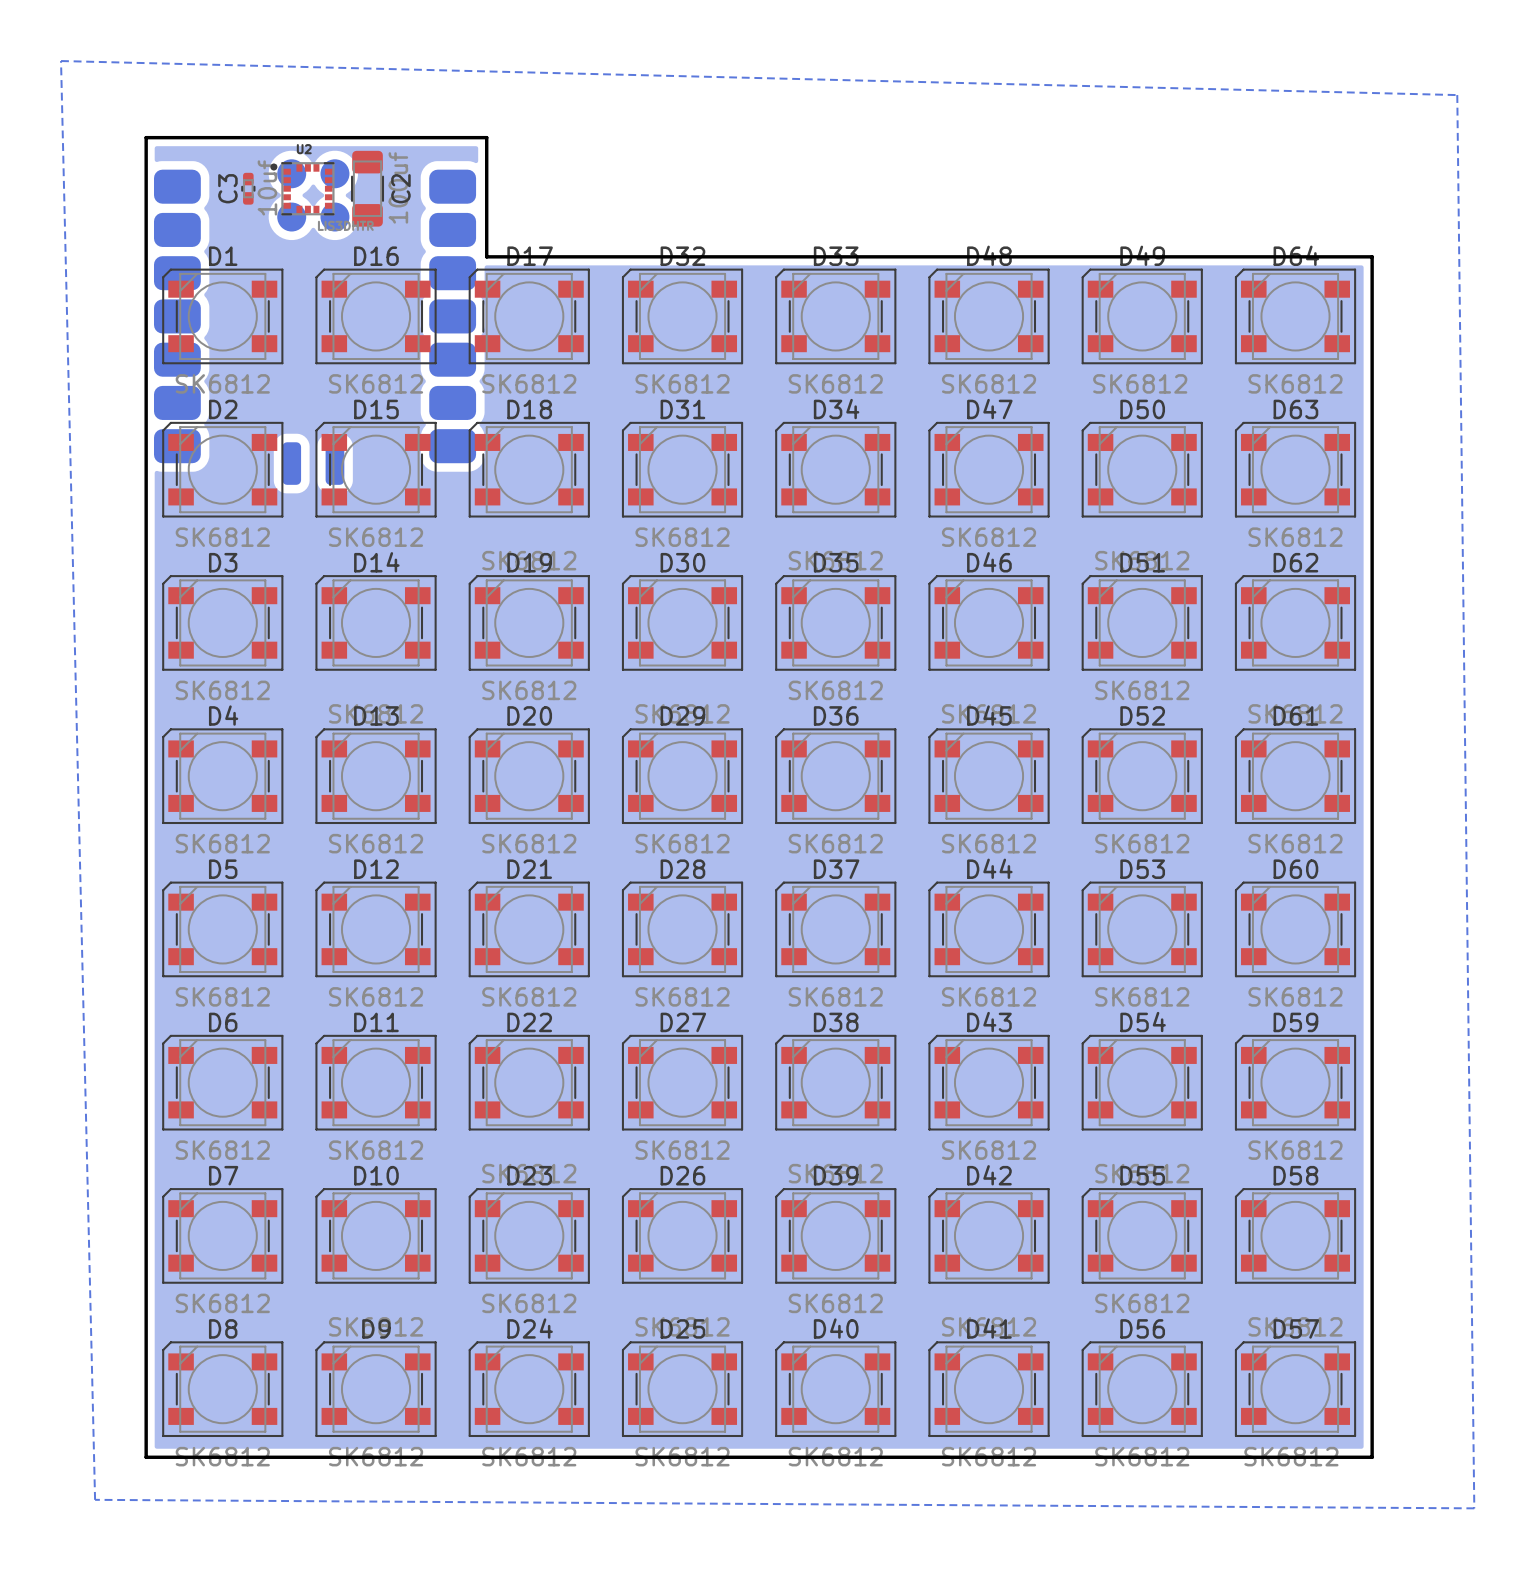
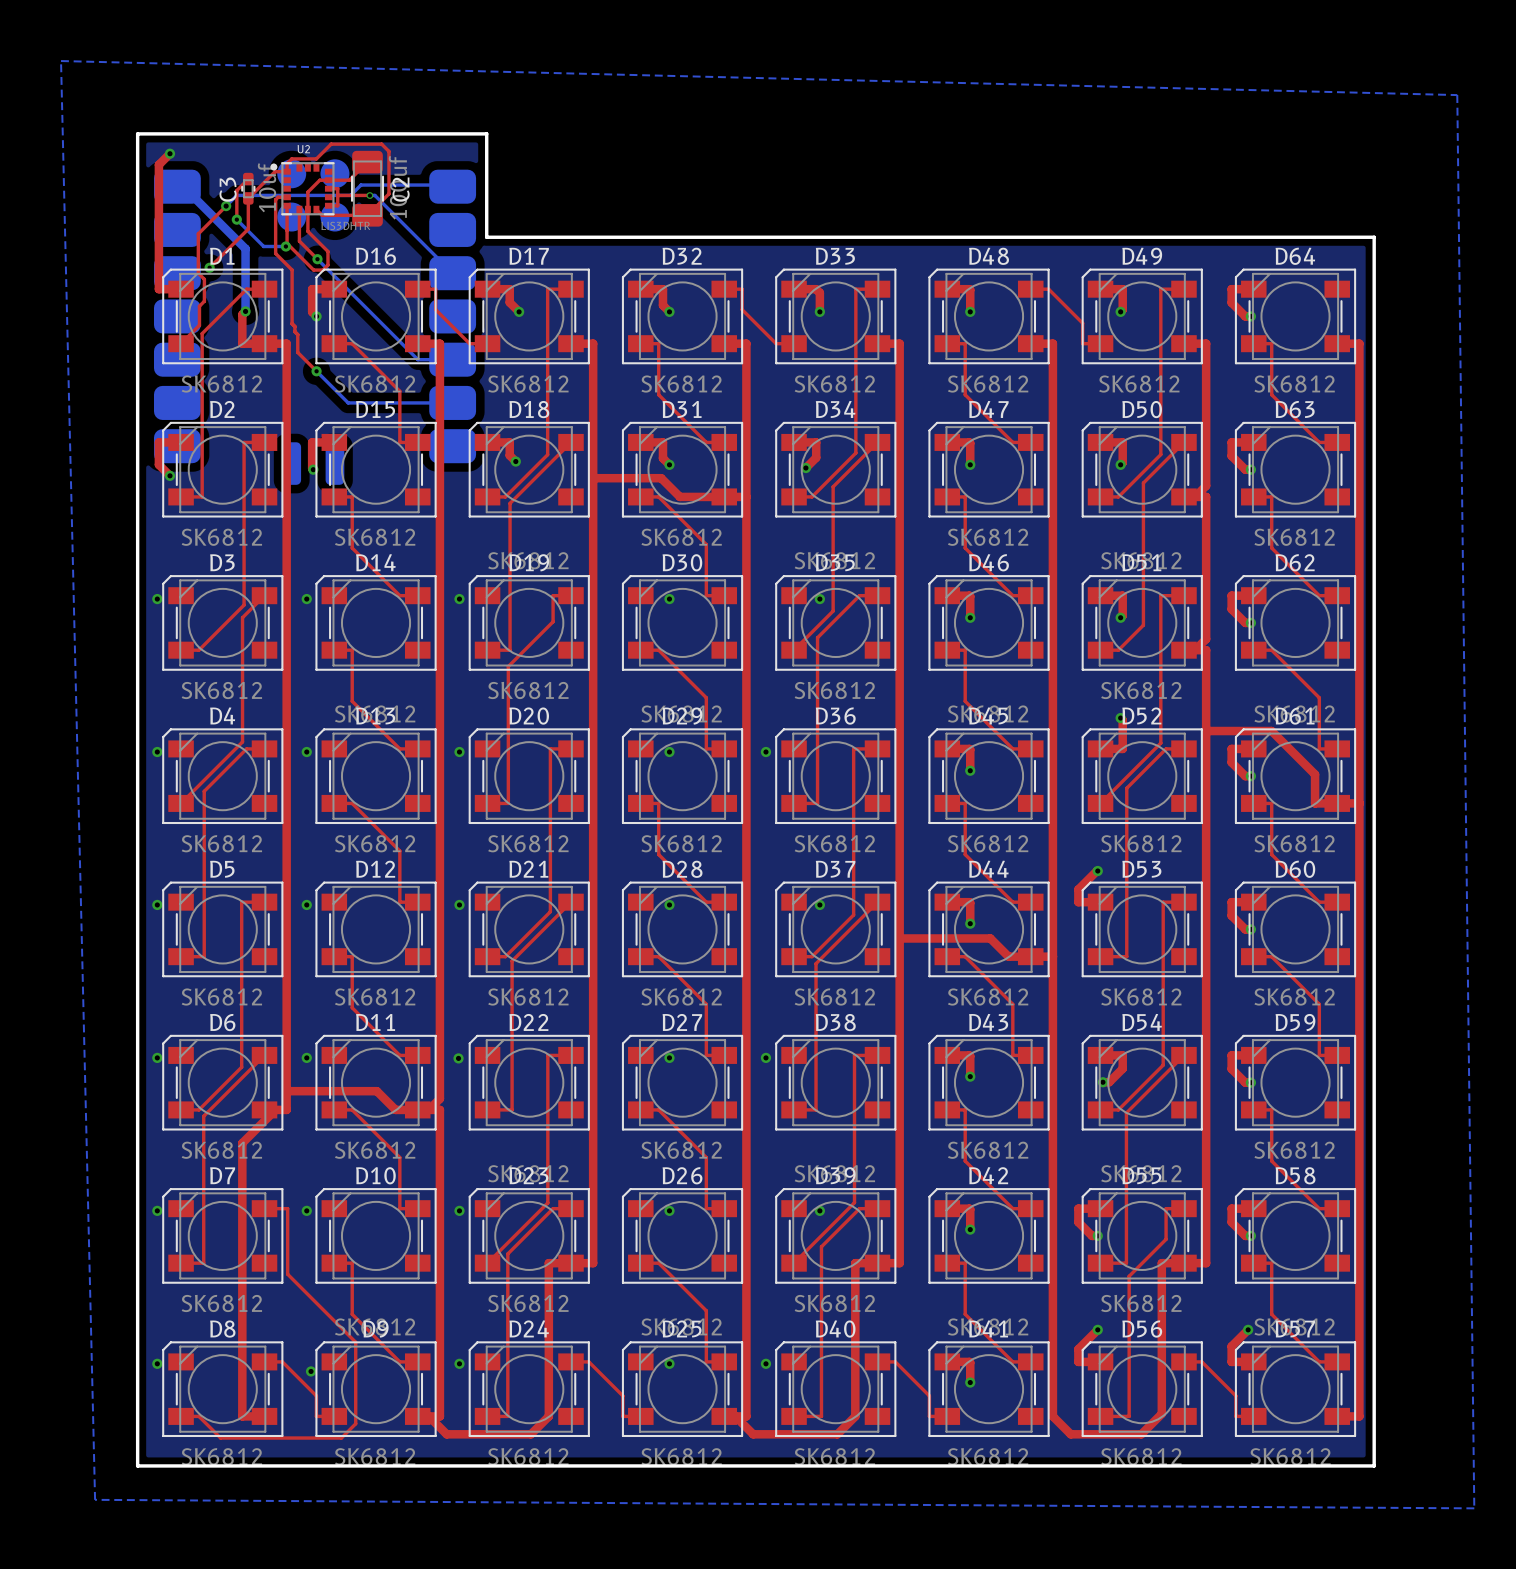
board edge: (486, 137) (146, 137) (146, 1457) (1372, 1457) (1372, 256) (486, 256) (486, 237) -> (486, 137) (486, 133) (137, 133) (137, 1465) (1374, 1465) (1374, 237) (486, 237)
top track: none -> (169, 153) (158, 164) (158, 289) (181, 289)
via: none -> (169, 153)
top track: none -> (367, 162) (349, 180) (319, 180) (307, 192) (307, 231) (327, 251) (327, 265) (323, 270) (313, 270) (287, 244)
top track: none -> (248, 179) (236, 190) (236, 219)
bottom track: none -> (177, 186) (183, 186) (245, 248) (245, 311)
bottom track: none -> (452, 186) (451, 185) (361, 185) (350, 195) (236, 195) (226, 206)
top track: none -> (328, 188) (337, 188) (337, 205) (328, 205)
top track: none -> (337, 195) (369, 195)
bottom track: none -> (369, 195) (374, 195) (452, 273)
via: none -> (369, 195)
top track: none -> (287, 197) (278, 197) (275, 199) (275, 253) (292, 270) (292, 323) (297, 334) (297, 352) (316, 371)
top track: none -> (287, 205) (287, 244)
top track: none -> (226, 206) (198, 233) (198, 273) (204, 279) (204, 301) (199, 306) (199, 325) (181, 343)
via: none -> (226, 206)
top track: none -> (299, 209) (299, 241) (317, 259)
top track: none -> (316, 209) (322, 215) (367, 215) (388, 193) (388, 151) (381, 144) (331, 144) (316, 158) (291, 158) (287, 163) (287, 171) (275, 171) (248, 198) (248, 229) (209, 267)
bottom track: none -> (236, 219) (263, 246) (285, 246)
via: none -> (236, 219)
via: none -> (285, 246)
bottom track: none -> (317, 259) (417, 359) (452, 359)
via: none -> (317, 259)
via: none -> (209, 267)
top track: none -> (264, 289) (246, 289) (202, 333) (202, 496) (181, 496)
top track: none -> (334, 289) (312, 289) (312, 312) (316, 316)
top track: none -> (417, 289) (435, 289) (435, 309) (469, 343) (487, 343)
top track: none -> (487, 289) (509, 289) (509, 302) (519, 311)
top track: none -> (571, 289) (547, 289) (547, 454) (505, 496) (487, 496)
top track: none -> (640, 289) (662, 289) (662, 305) (669, 311)
top track: none -> (724, 289) (742, 289) (742, 309) (776, 343) (794, 343)
top track: none -> (794, 289) (816, 289) (819, 292) (819, 311)
top track: none -> (877, 289) (855, 289) (855, 453) (811, 496) (794, 496)
top track: none -> (947, 289) (969, 289) (970, 311)
top track: none -> (1030, 289) (1048, 289) (1082, 323) (1082, 343) (1100, 343)
top track: none -> (1100, 289) (1122, 289) (1122, 309) (1120, 311)
top track: none -> (1183, 289) (1160, 289) (1160, 454) (1118, 496) (1100, 496)
top track: none -> (1253, 289) (1231, 289) (1231, 302) (1245, 316) (1250, 316)
top track: none -> (245, 311) (242, 314) (242, 343) (286, 343) (286, 1109) (264, 1109)
via: none -> (245, 311)
via: none -> (519, 311)
via: none -> (669, 311)
via: none -> (819, 311)
via: none -> (970, 311)
via: none -> (1120, 311)
via: none -> (316, 316)
via: none -> (1250, 316)
top track: none -> (334, 343) (352, 343) (399, 391) (399, 442) (417, 442)
top track: none -> (417, 343) (439, 343) (439, 1098) (428, 1109)
top track: none -> (571, 343) (593, 343) (593, 1263) (548, 1263) (548, 1416) (530, 1434) (446, 1434) (428, 1416)
top track: none -> (640, 343) (658, 343) (658, 394) (706, 442) (724, 442)
top track: none -> (724, 343) (746, 343) (746, 1416) (724, 1416)
top track: none -> (877, 343) (899, 343) (899, 1263) (855, 1263) (855, 1416) (837, 1434) (753, 1434) (735, 1416)
top track: none -> (947, 343) (965, 343) (965, 394) (1012, 442) (1030, 442)
top track: none -> (1030, 343) (1052, 343) (1052, 1416) (1070, 1434) (1141, 1434) (1161, 1413) (1161, 1263) (1206, 1263) (1206, 650) (1183, 650)
top track: none -> (1183, 343) (1206, 343) (1206, 485) (1195, 496)
top track: none -> (1253, 343) (1271, 343) (1271, 394) (1319, 442) (1337, 442)
top track: none -> (1337, 343) (1359, 343) (1359, 1416) (1337, 1416)
bottom track: none -> (316, 371) (348, 402) (452, 402)
via: none -> (316, 371)
top track: none -> (181, 442) (158, 442) (158, 464) (169, 475)
top track: none -> (264, 442) (244, 442) (244, 605) (198, 650) (181, 650)
top track: none -> (334, 442) (312, 442) (313, 469)
top track: none -> (487, 442) (509, 442) (509, 455) (515, 461)
top track: none -> (571, 442) (510, 503) (510, 650) (487, 650)
top track: none -> (640, 442) (662, 442) (662, 458) (669, 464)
top track: none -> (794, 442) (816, 442) (816, 457) (805, 468)
top track: none -> (877, 442) (833, 486) (833, 611) (794, 650)
top track: none -> (947, 442) (969, 442) (970, 464)
top track: none -> (1100, 442) (1122, 442) (1122, 462) (1120, 464)
top track: none -> (1183, 442) (1143, 483) (1143, 625) (1118, 650) (1100, 650)
top track: none -> (1253, 442) (1231, 442) (1231, 455) (1245, 469) (1250, 469)
via: none -> (515, 461)
via: none -> (669, 464)
via: none -> (970, 464)
via: none -> (1120, 464)
via: none -> (805, 468)
via: none -> (313, 469)
via: none -> (1250, 469)
via: none -> (169, 475)
top track: none -> (593, 478) (661, 478) (679, 496) (746, 496)
top track: none -> (334, 496) (352, 496) (352, 548) (399, 595) (417, 595)
top track: none -> (640, 496) (658, 496) (706, 544) (706, 595) (724, 595)
top track: none -> (947, 496) (965, 496) (965, 548) (1012, 595) (1030, 595)
top track: none -> (1183, 496) (1206, 496) (1206, 639) (1195, 650)
top track: none -> (1253, 496) (1271, 496) (1271, 548) (1319, 595) (1337, 595)
top track: none -> (264, 595) (242, 617) (242, 741) (181, 803)
top track: none -> (571, 595) (553, 595) (553, 621) (508, 666) (508, 803) (487, 803)
top track: none -> (877, 595) (859, 595) (817, 637) (817, 803) (794, 803)
top track: none -> (947, 595) (969, 595) (970, 617)
top track: none -> (1100, 595) (1122, 595) (1122, 615) (1120, 617)
top track: none -> (1183, 595) (1160, 595) (1160, 743) (1100, 803)
top track: none -> (1253, 595) (1231, 595) (1231, 609) (1245, 622) (1250, 622)
via: none -> (157, 599)
via: none -> (306, 599)
via: none -> (459, 599)
via: none -> (669, 599)
via: none -> (819, 599)
via: none -> (970, 617)
via: none -> (1120, 617)
via: none -> (1250, 622)
top track: none -> (334, 650) (352, 650) (352, 701) (399, 748) (417, 748)
top track: none -> (640, 650) (658, 650) (706, 697) (706, 748) (724, 748)
top track: none -> (947, 650) (965, 650) (965, 701) (1012, 748) (1030, 748)
top track: none -> (1253, 650) (1271, 650) (1319, 697) (1319, 748) (1337, 748)
top track: none -> (1120, 718) (1122, 720) (1122, 748) (1100, 748)
via: none -> (1120, 718)
top track: none -> (1206, 731) (1271, 731) (1315, 774) (1315, 803) (1359, 803)
top track: none -> (264, 748) (246, 748) (204, 791) (204, 956) (181, 956)
top track: none -> (571, 748) (550, 748) (550, 911) (505, 956) (487, 956)
top track: none -> (877, 748) (853, 748) (853, 914) (811, 956) (794, 956)
top track: none -> (947, 748) (969, 748) (970, 770)
top track: none -> (1183, 748) (1166, 748) (1126, 788) (1126, 956) (1100, 956)
top track: none -> (1253, 748) (1231, 748) (1231, 762) (1245, 776) (1250, 776)
via: none -> (157, 752)
via: none -> (306, 752)
via: none -> (459, 752)
via: none -> (669, 752)
via: none -> (765, 752)
via: none -> (970, 770)
via: none -> (1250, 776)
top track: none -> (334, 803) (352, 803) (399, 851) (399, 902) (417, 902)
top track: none -> (640, 803) (658, 803) (658, 854) (706, 902) (724, 902)
top track: none -> (947, 803) (965, 803) (965, 854) (1012, 902) (1030, 902)
top track: none -> (1253, 803) (1271, 803) (1271, 854) (1319, 902) (1337, 902)
top track: none -> (1097, 871) (1078, 889) (1078, 902) (1100, 902)
via: none -> (1097, 871)
top track: none -> (264, 902) (241, 902) (241, 1067) (198, 1109) (181, 1109)
top track: none -> (571, 902) (512, 961) (512, 1109) (487, 1109)
top track: none -> (877, 902) (816, 963) (816, 1109) (794, 1109)
top track: none -> (947, 902) (969, 902) (970, 923)
top track: none -> (1183, 902) (1163, 902) (1163, 1065) (1118, 1109) (1100, 1109)
top track: none -> (1253, 902) (1231, 902) (1231, 915) (1245, 929) (1250, 929)
via: none -> (157, 904)
via: none -> (306, 904)
via: none -> (459, 904)
via: none -> (669, 904)
via: none -> (819, 904)
via: none -> (970, 923)
via: none -> (1250, 929)
top track: none -> (899, 938) (990, 938) (1008, 956) (1052, 956)
top track: none -> (334, 956) (352, 956) (352, 1007) (399, 1055) (417, 1055)
top track: none -> (640, 956) (658, 956) (706, 1004) (706, 1055) (724, 1055)
top track: none -> (947, 956) (965, 956) (1012, 1004) (1012, 1055) (1030, 1055)
top track: none -> (1253, 956) (1271, 956) (1319, 1004) (1319, 1055) (1337, 1055)
top track: none -> (264, 1055) (203, 1116) (203, 1263) (181, 1263)
top track: none -> (571, 1055) (547, 1055) (547, 1202) (487, 1263)
top track: none -> (877, 1055) (854, 1055) (854, 1202) (794, 1263)
top track: none -> (947, 1055) (969, 1055) (970, 1076)
top track: none -> (1100, 1055) (1122, 1055) (1122, 1068) (1109, 1082) (1102, 1082)
top track: none -> (1183, 1055) (1126, 1112) (1126, 1263) (1100, 1263)
top track: none -> (1253, 1055) (1231, 1055) (1231, 1068) (1245, 1082) (1250, 1082)
via: none -> (157, 1057)
via: none -> (306, 1057)
via: none -> (669, 1057)
via: none -> (765, 1057)
via: none -> (458, 1058)
via: none -> (970, 1076)
via: none -> (1102, 1082)
via: none -> (1250, 1082)
top track: none -> (286, 1091) (376, 1091) (395, 1109) (439, 1109) (439, 1416) (417, 1416)
top track: none -> (275, 1109) (242, 1143) (242, 1416) (264, 1416)
top track: none -> (334, 1109) (352, 1109) (399, 1157) (399, 1208) (417, 1208)
top track: none -> (640, 1109) (658, 1109) (706, 1157) (706, 1208) (724, 1208)
top track: none -> (947, 1109) (965, 1109) (965, 1161) (1012, 1208) (1030, 1208)
top track: none -> (1253, 1109) (1271, 1109) (1271, 1161) (1319, 1208) (1337, 1208)
top track: none -> (264, 1208) (287, 1208) (287, 1274) (355, 1342) (355, 1423) (341, 1438) (220, 1438) (198, 1416) (181, 1416)
top track: none -> (571, 1208) (553, 1208) (507, 1253) (507, 1416) (487, 1416)
top track: none -> (877, 1208) (859, 1208) (821, 1246) (821, 1416) (794, 1416)
top track: none -> (947, 1208) (969, 1208) (970, 1229)
top track: none -> (1100, 1208) (1078, 1208) (1078, 1222) (1092, 1235) (1097, 1235)
top track: none -> (1183, 1208) (1166, 1208) (1166, 1239) (1129, 1276) (1129, 1416) (1100, 1416)
top track: none -> (1253, 1208) (1231, 1208) (1231, 1222) (1245, 1235) (1250, 1235)
via: none -> (157, 1210)
via: none -> (306, 1210)
via: none -> (459, 1210)
via: none -> (669, 1210)
via: none -> (819, 1210)
via: none -> (970, 1229)
via: none -> (1097, 1235)
via: none -> (1250, 1235)
top track: none -> (334, 1263) (352, 1263) (352, 1314) (399, 1361) (417, 1361)
top track: none -> (640, 1263) (658, 1263) (706, 1310) (706, 1361) (724, 1361)
top track: none -> (947, 1263) (965, 1263) (965, 1314) (1012, 1361) (1030, 1361)
top track: none -> (1253, 1263) (1271, 1263) (1271, 1314) (1319, 1361) (1337, 1361)
top track: none -> (1097, 1329) (1078, 1349) (1078, 1361) (1100, 1361)
via: none -> (1097, 1329)
top track: none -> (1248, 1329) (1231, 1346) (1231, 1361) (1253, 1361)
via: none -> (1248, 1329)
top track: none -> (264, 1361) (282, 1361) (316, 1395) (316, 1416) (334, 1416)
top track: none -> (571, 1361) (588, 1361) (622, 1395) (622, 1416) (640, 1416)
top track: none -> (877, 1361) (895, 1361) (929, 1395) (929, 1416) (947, 1416)
top track: none -> (947, 1361) (969, 1361) (970, 1382)
top track: none -> (1183, 1361) (1201, 1361) (1235, 1395) (1235, 1416) (1253, 1416)
via: none -> (157, 1363)
via: none -> (459, 1363)
via: none -> (669, 1363)
via: none -> (765, 1363)
via: none -> (311, 1371)
via: none -> (970, 1382)

